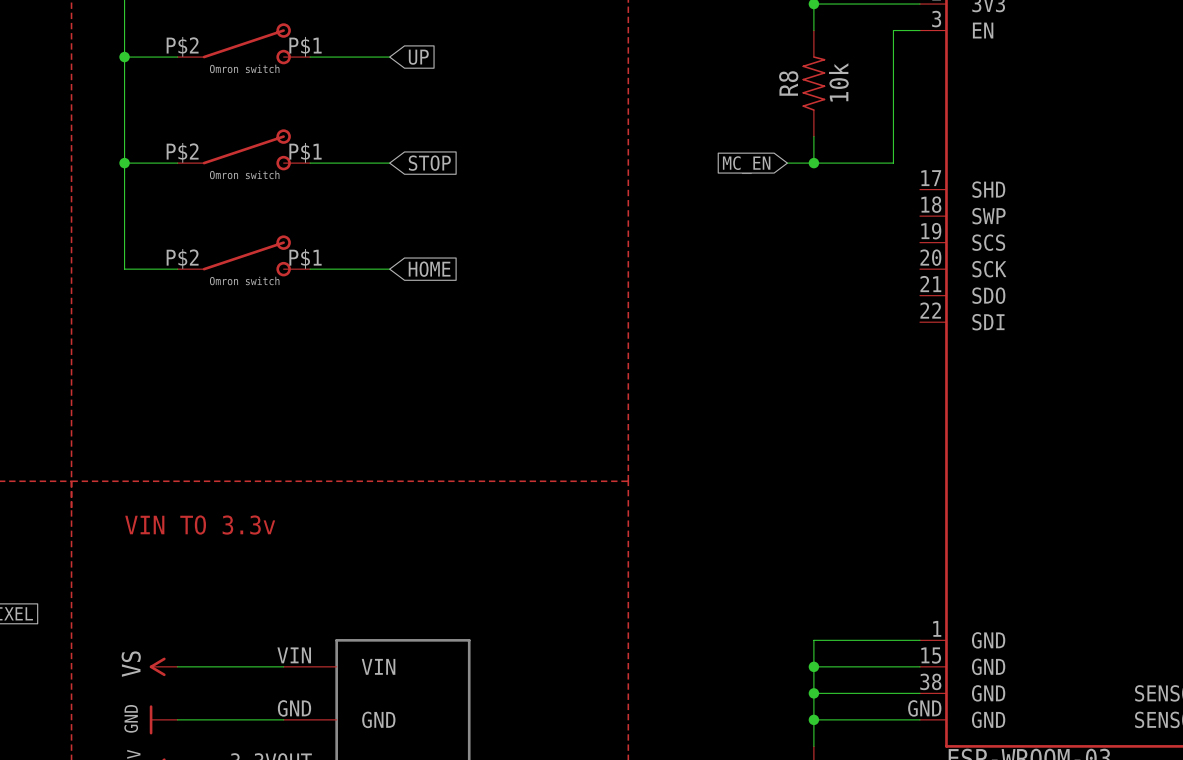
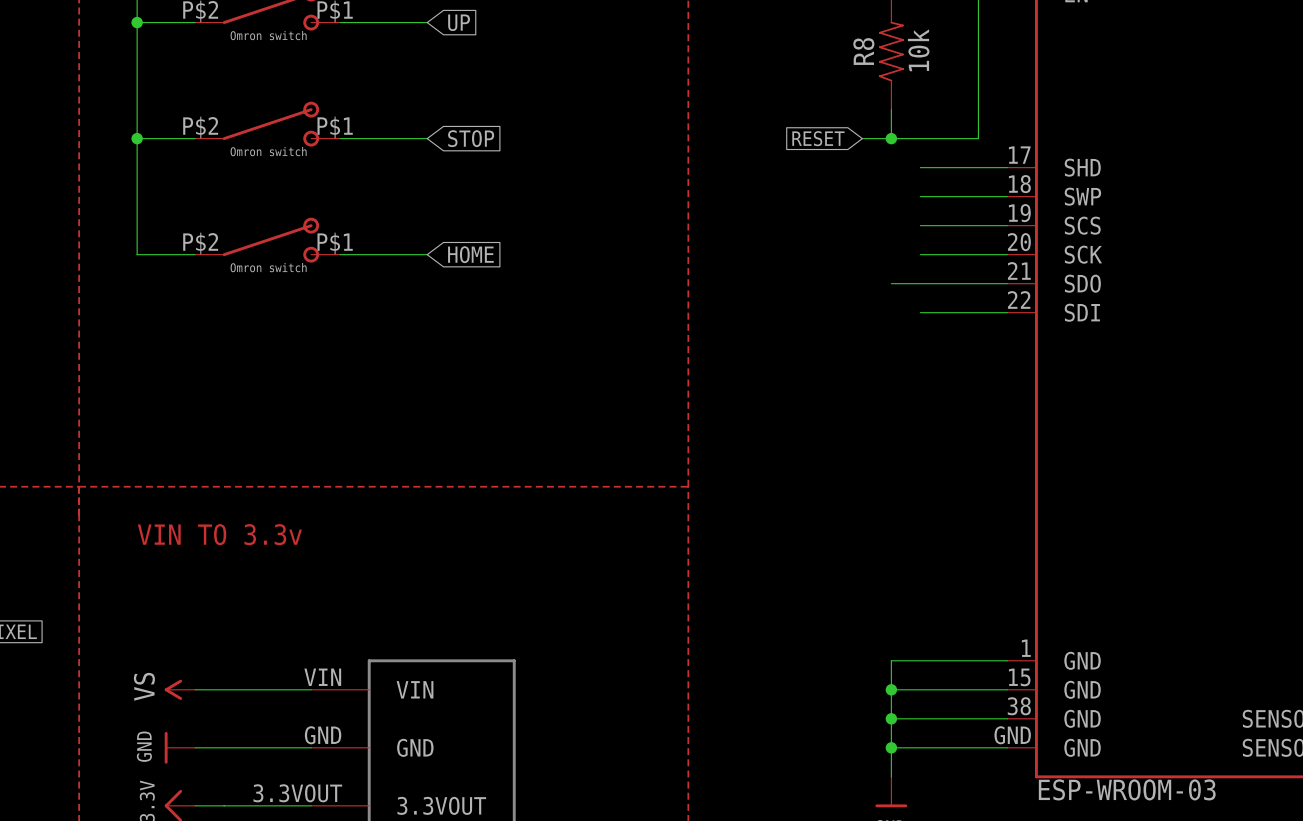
global label: MC_EN (746, 165) -> RESET (818, 138)
wire: none -> (920, 167) (1007, 167)
wire: none -> (920, 196) (1007, 196)
wire: none -> (920, 225) (1007, 225)
wire: none -> (920, 254) (1007, 254)
wire: none -> (891, 283) (1007, 283)
wire: none -> (920, 312) (1007, 312)

